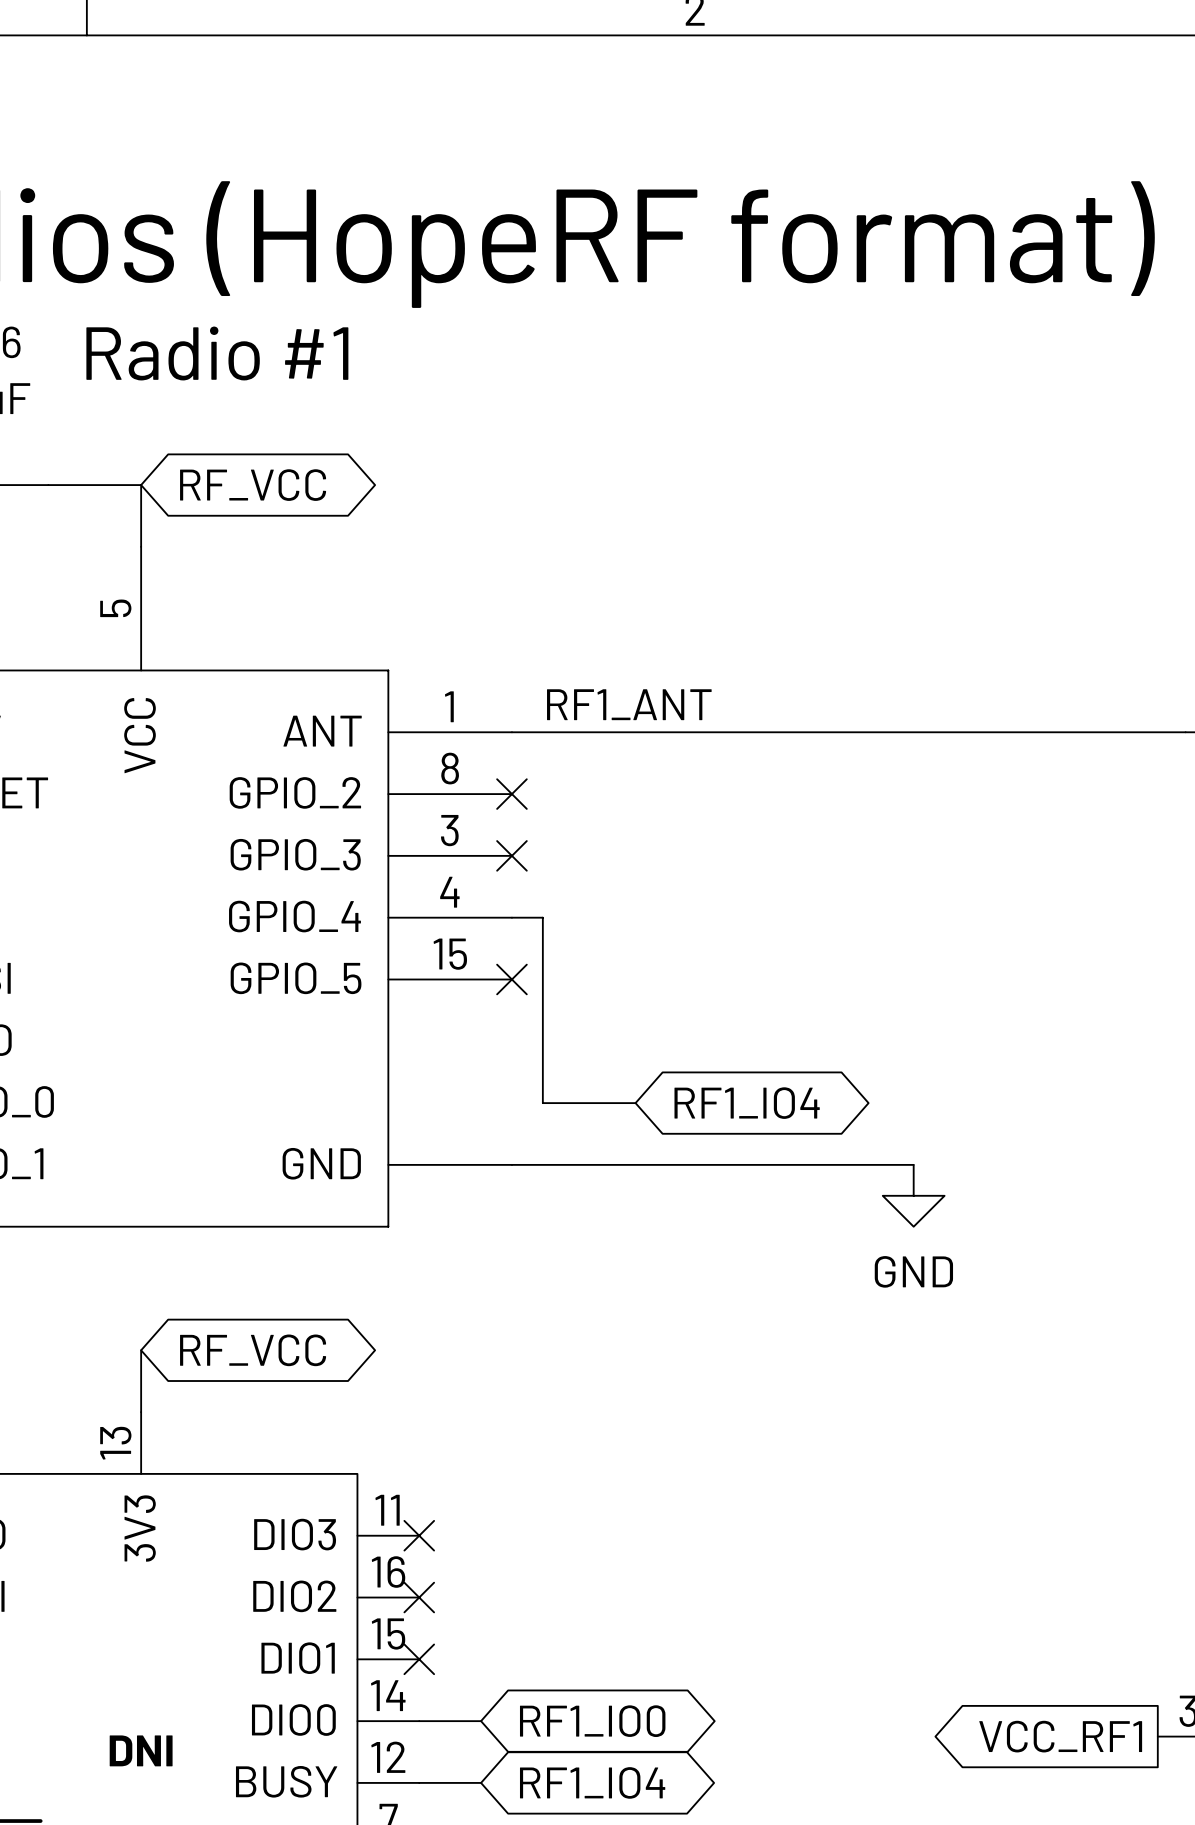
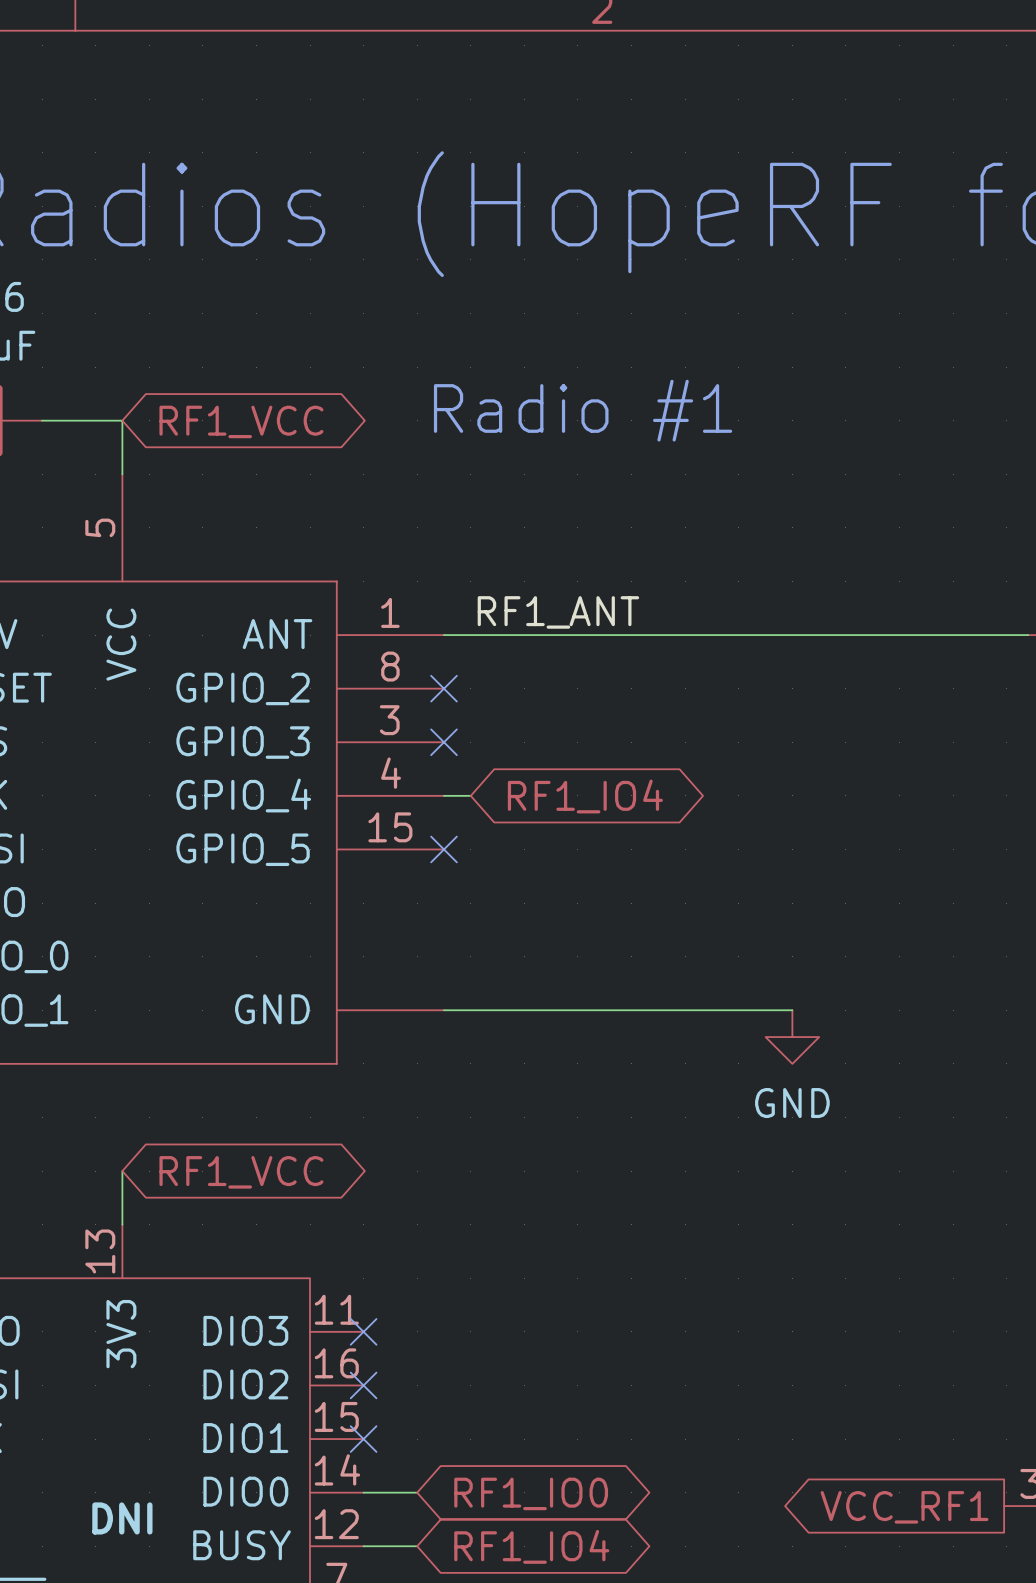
text position: Radio #1 (217, 353) -> Radio #1 (583, 410)
global label: RF_VCC (253, 485) -> RF1_VCC (241, 421)
wire: (542, 917) (542, 1103) (635, 1103) -> none
global label position: RF1_IO4 (747, 1103) -> RF1_IO4 (585, 796)
global label: RF_VCC (253, 1350) -> RF1_VCC (241, 1172)

